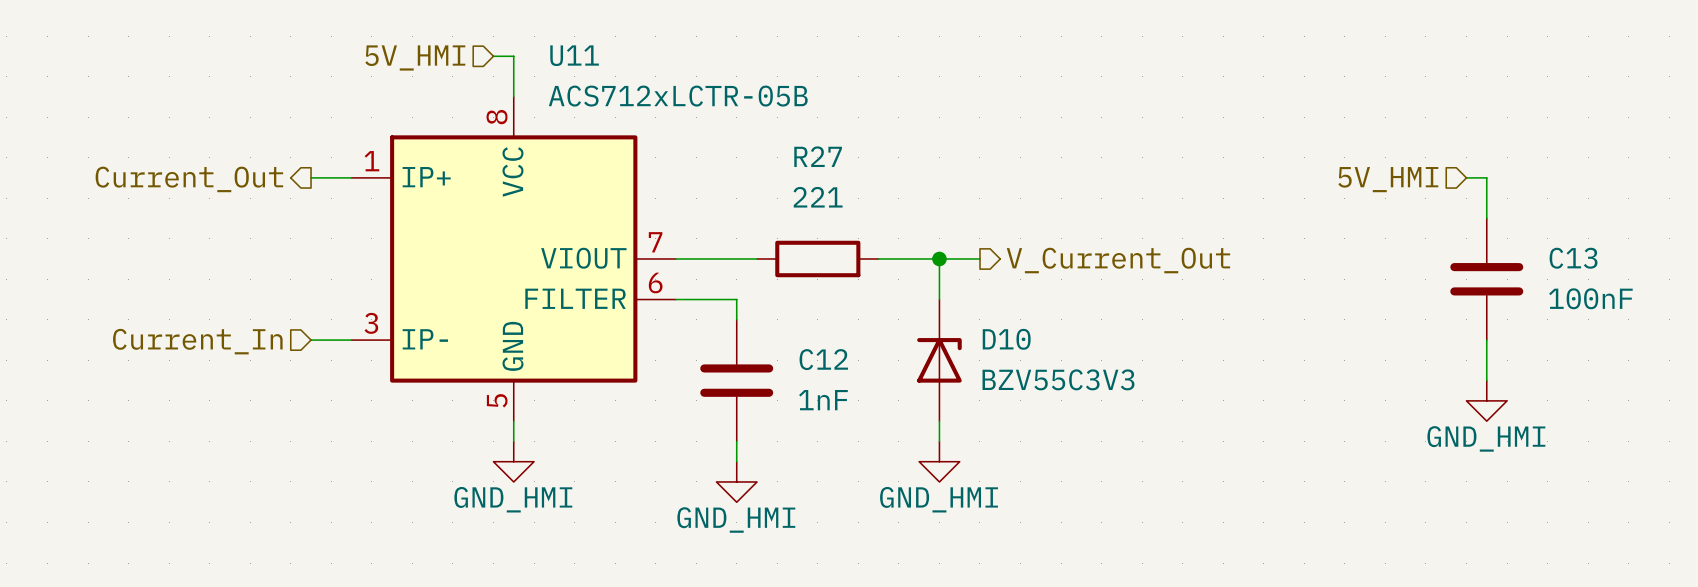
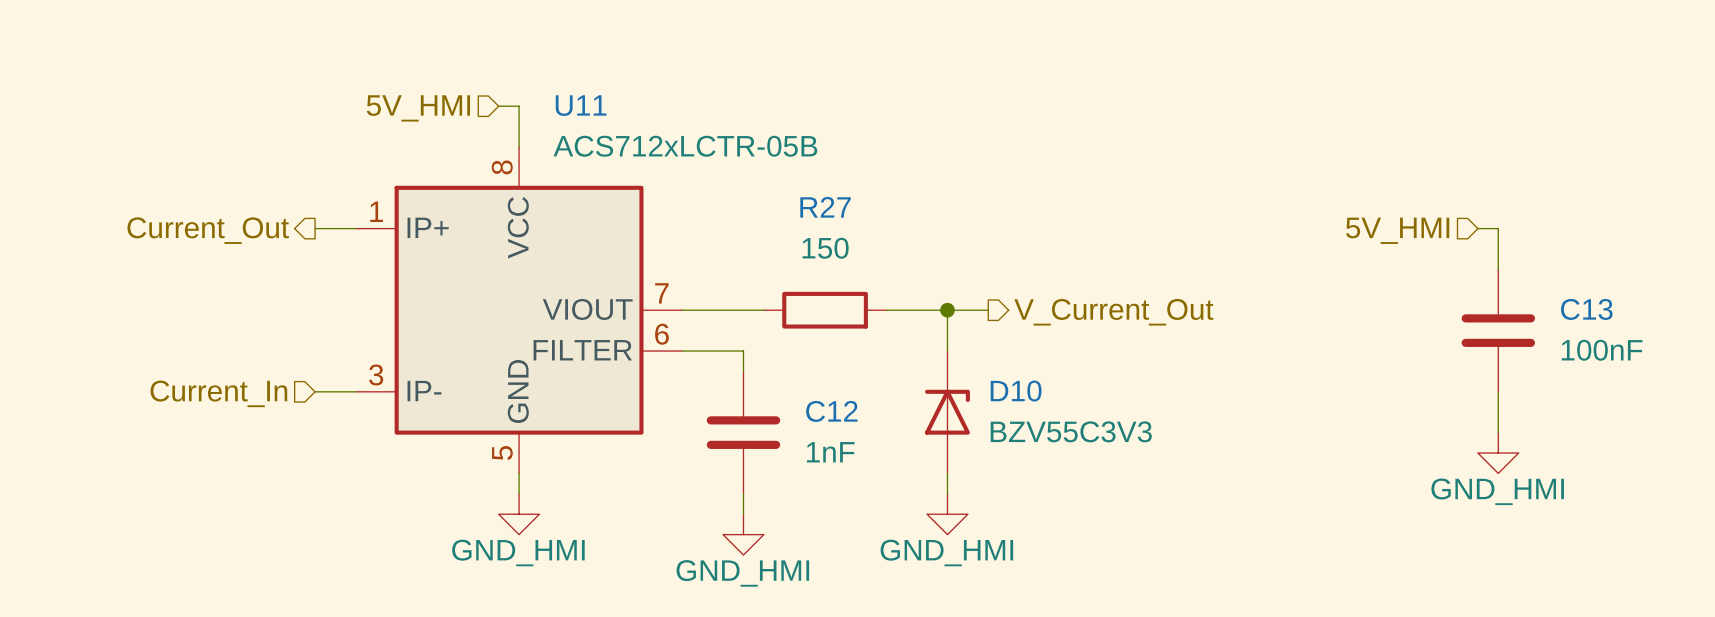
R27 value: 221 (818, 197) -> 150 (825, 248)

